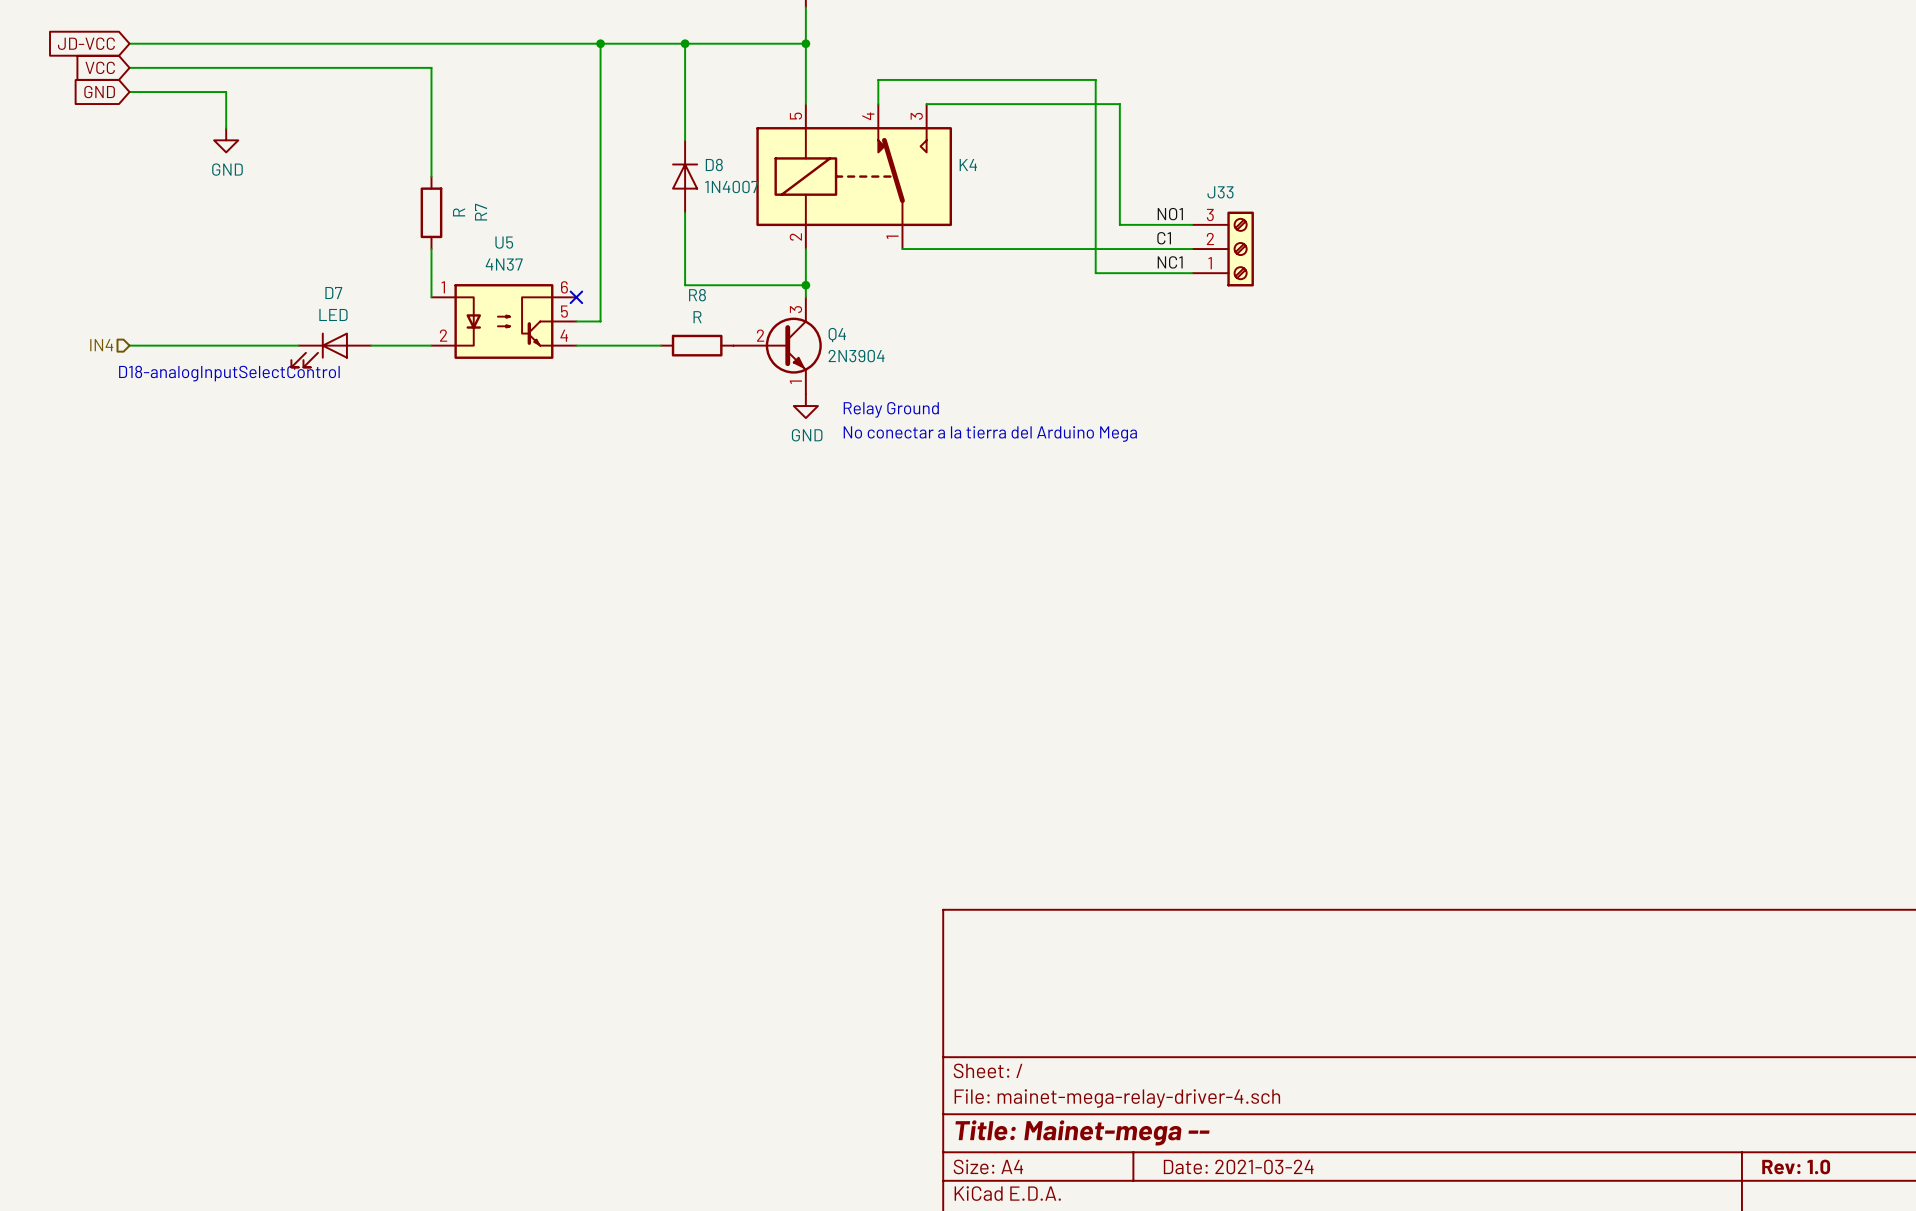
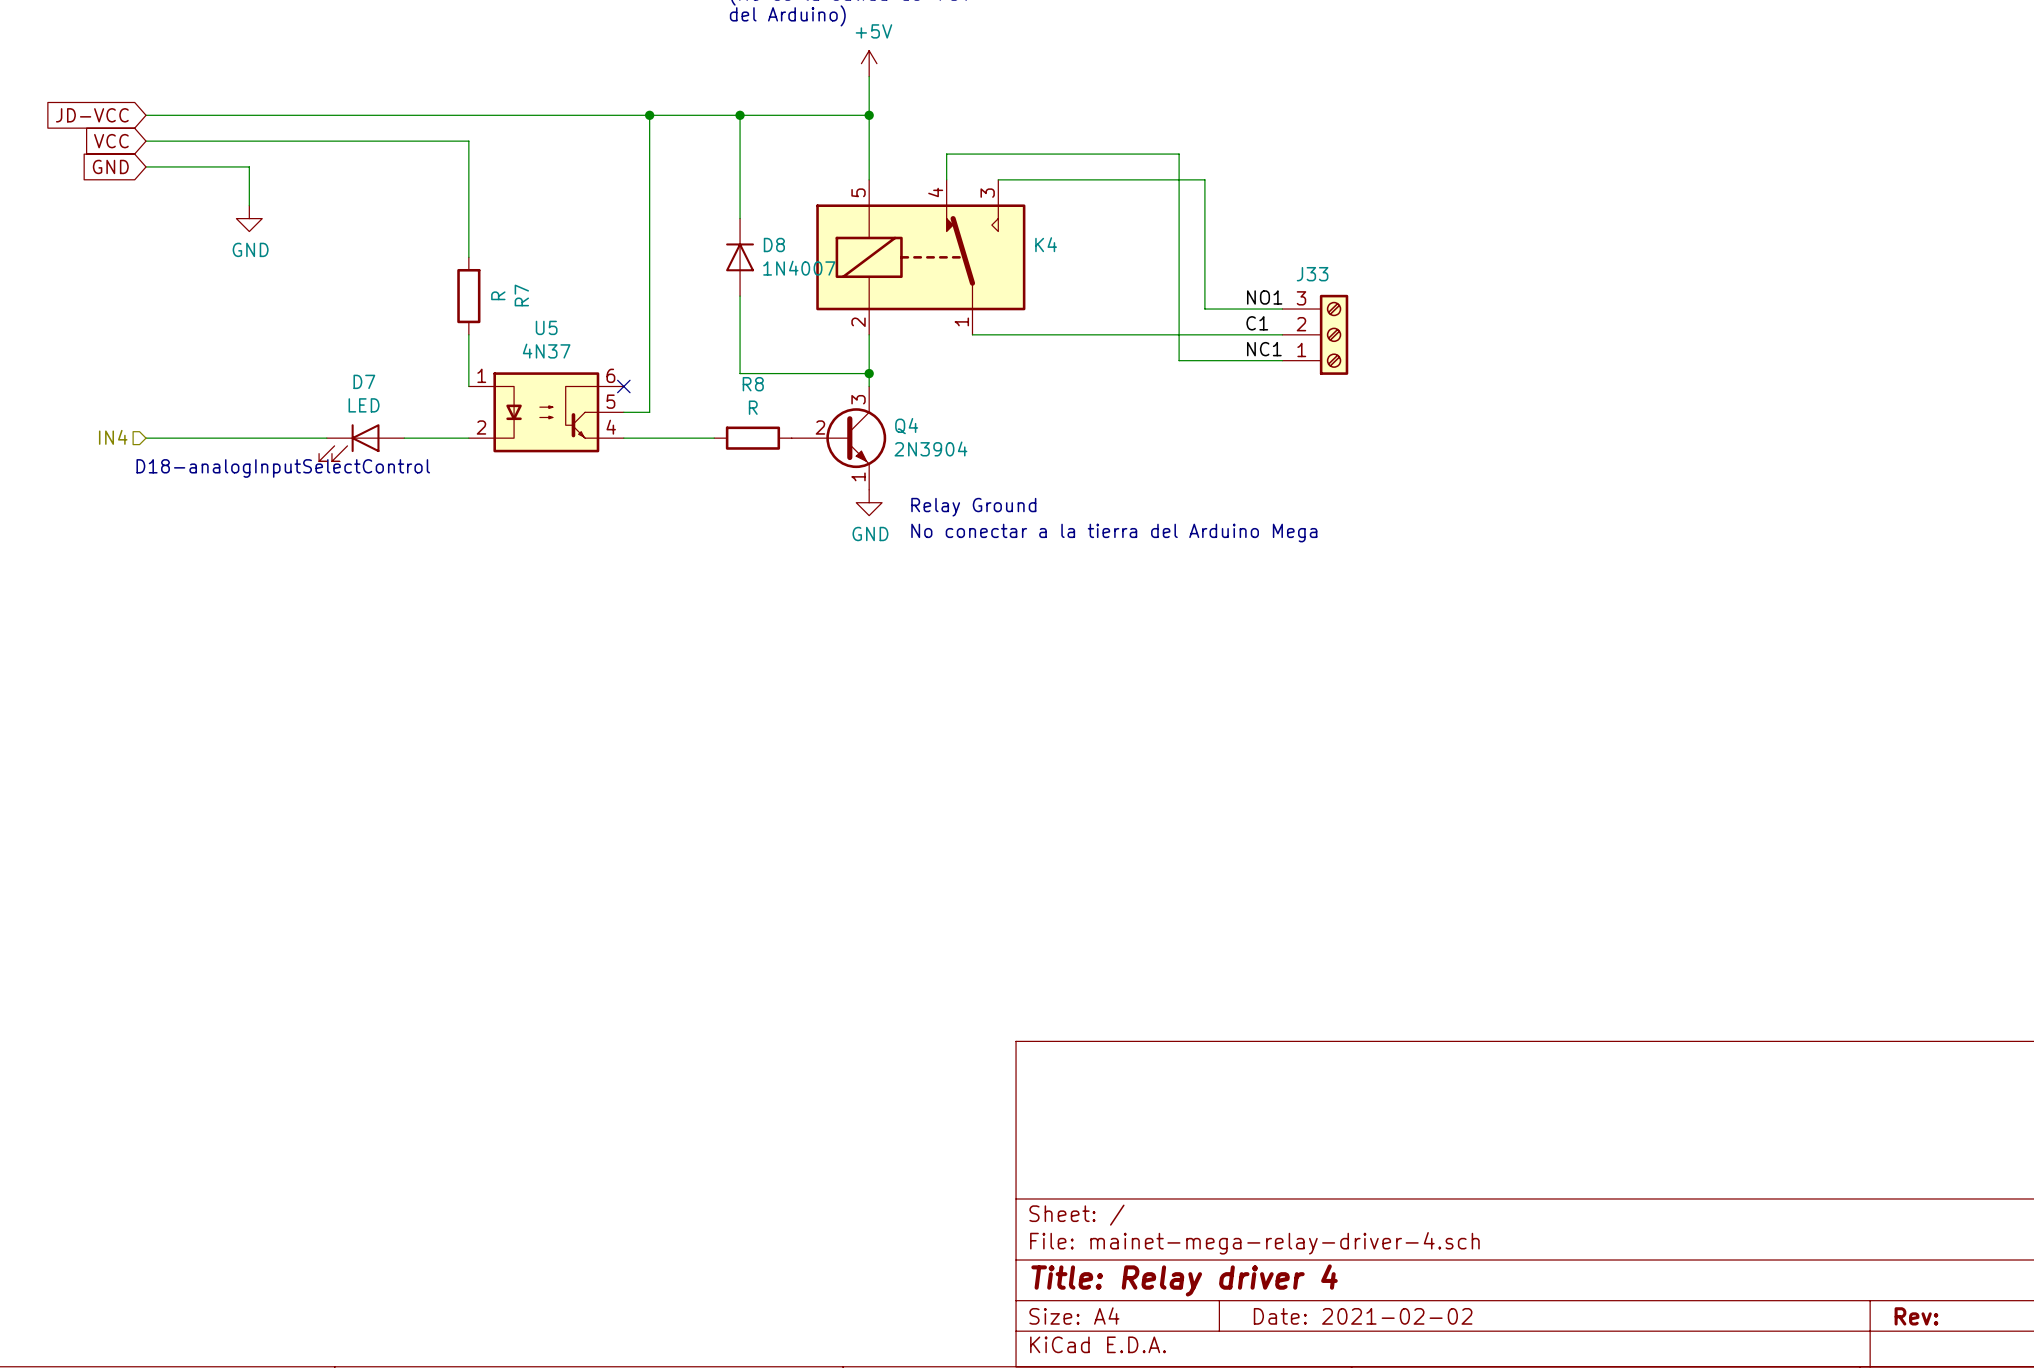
title block: Title: Mainet-mega -- (1082, 1132) -> Title: Relay driver 4 (1184, 1280)
title block: Date: 2021-03-24 (1238, 1166) -> Date: 2021-02-02 (1363, 1316)
title block: Rev: 1.0 (1796, 1166) -> Rev: (1916, 1316)

